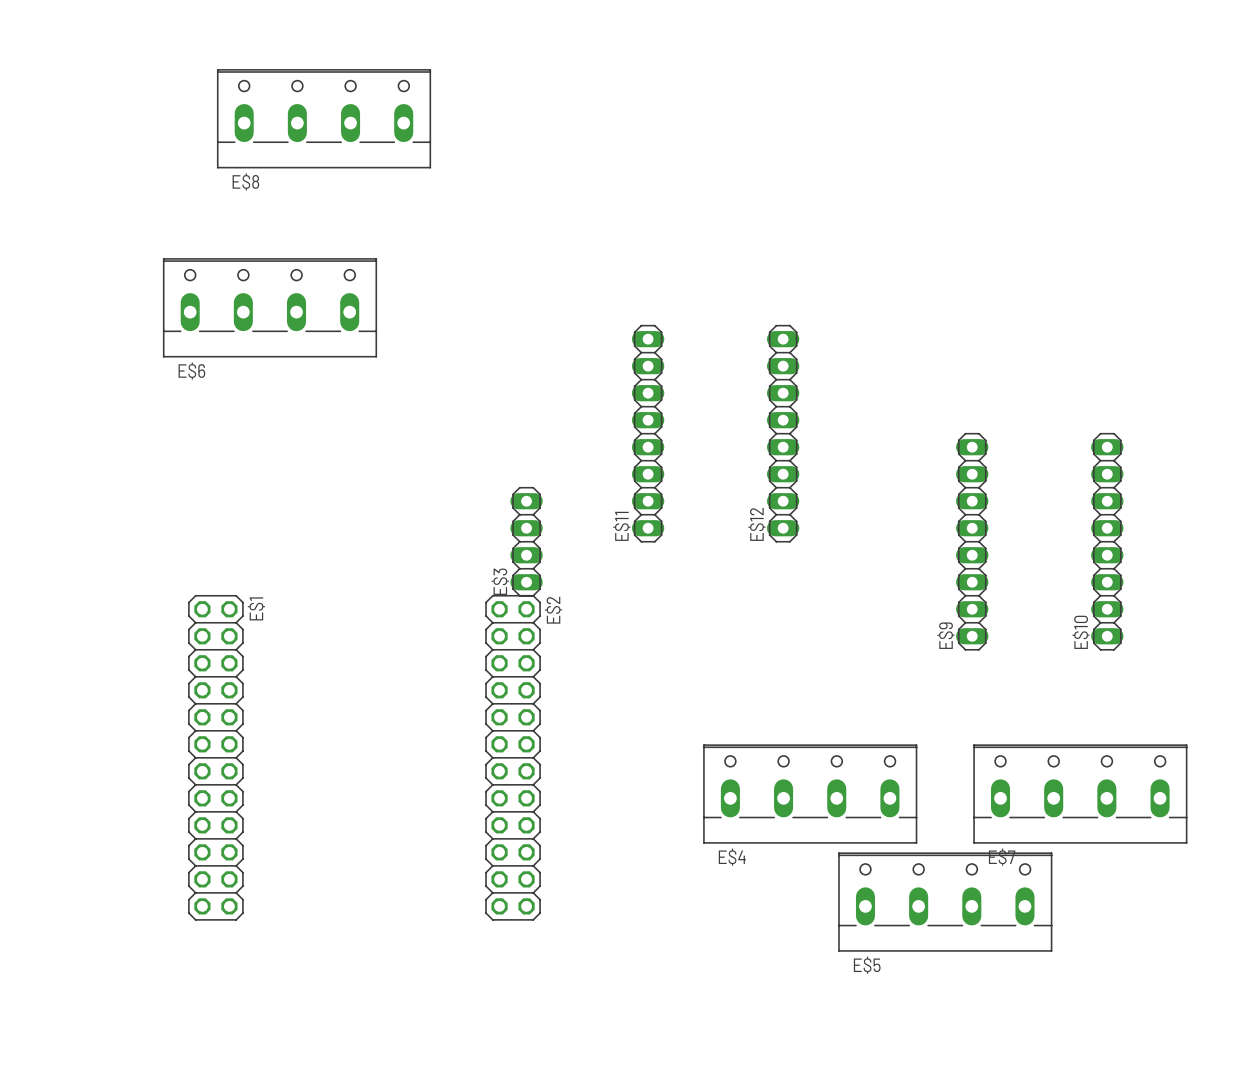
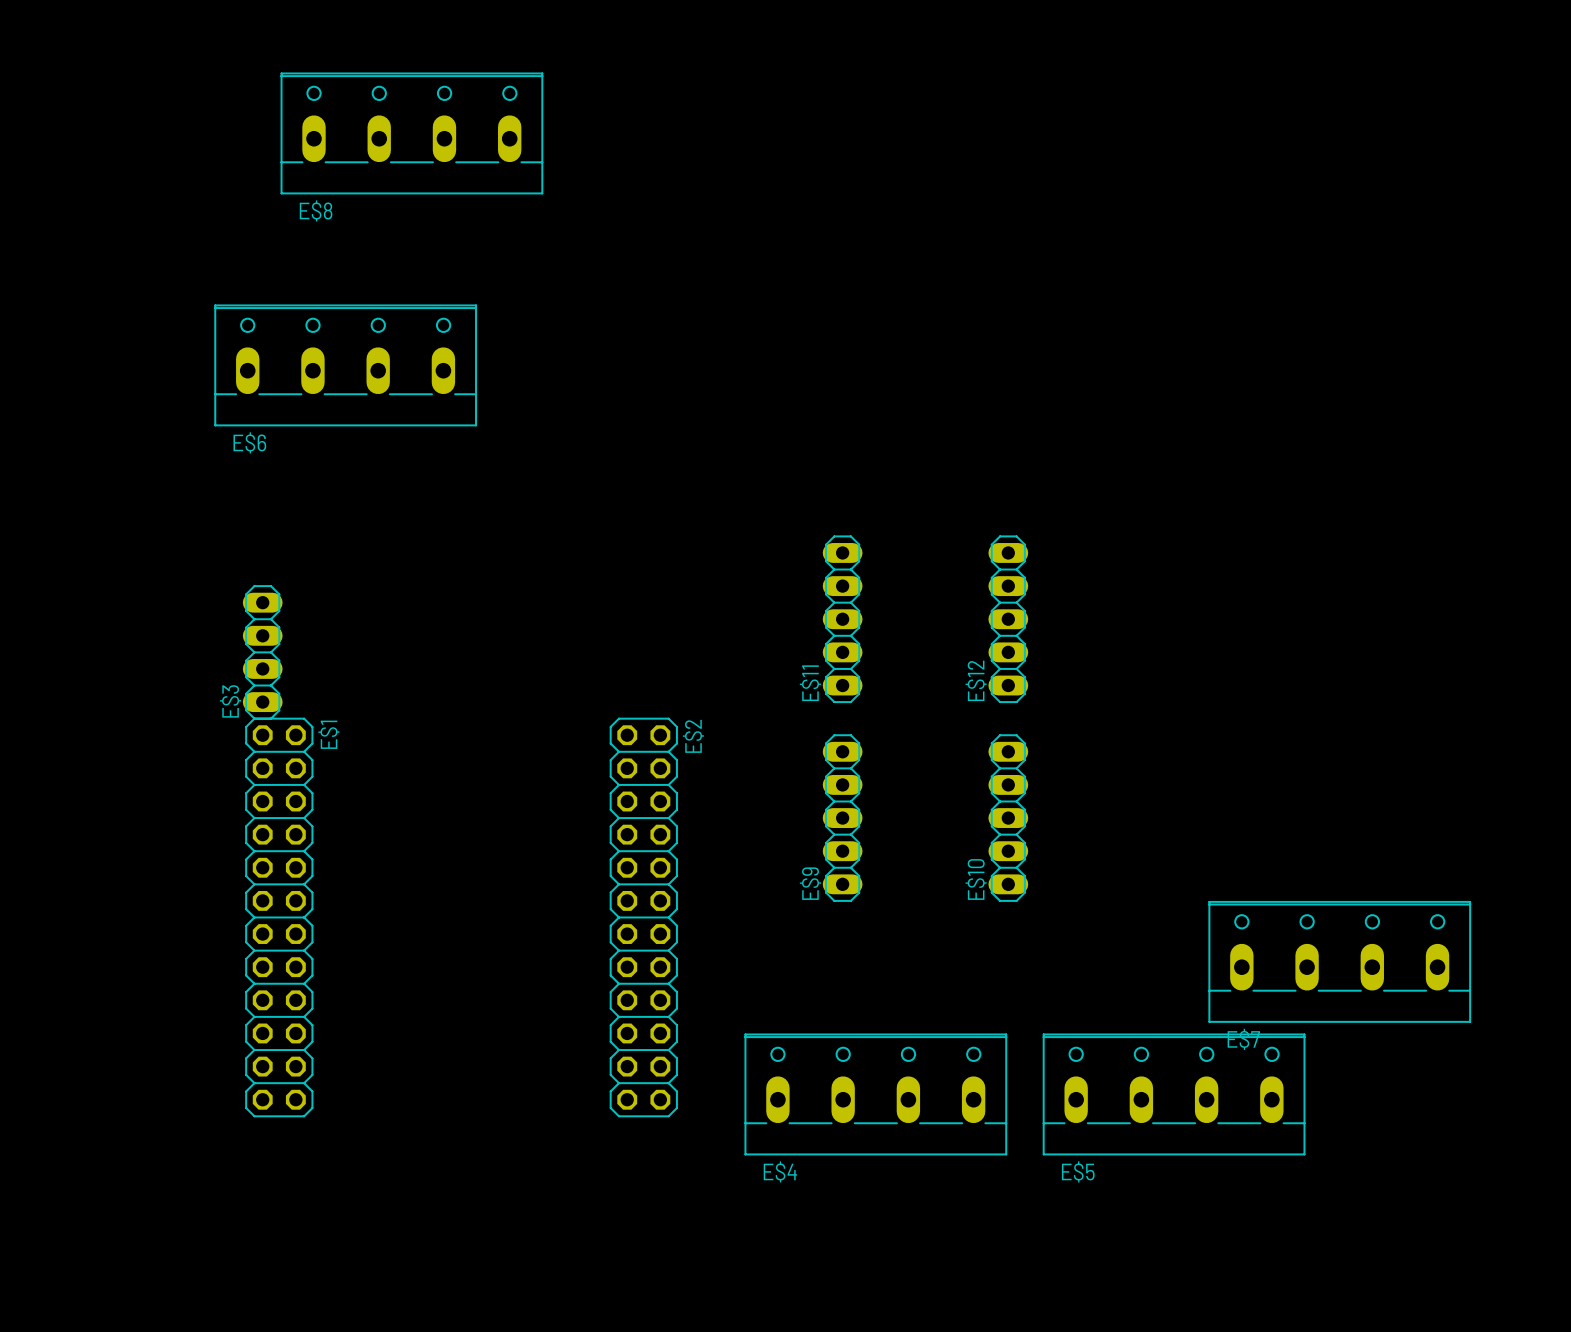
E$11 footprint: [631, 324, 665, 543] -> [822, 535, 863, 704]
E$12 footprint: [766, 324, 800, 543] -> [988, 535, 1029, 704]
E$9 footprint: [956, 432, 989, 651] -> [822, 734, 863, 902]
E$10 footprint: [1091, 432, 1124, 651] -> [988, 734, 1029, 902]
E$12 name position: E$12 (756, 524) -> E$12 (976, 680)
E$11 name position: E$11 (621, 526) -> E$11 (810, 683)
E$3 position: (526, 541) -> (262, 652)
E$10 name position: E$10 (1081, 632) -> E$10 (976, 879)
E$9 name position: E$9 (945, 635) -> E$9 (810, 883)
E$4 position: (810, 794) -> (875, 1094)

